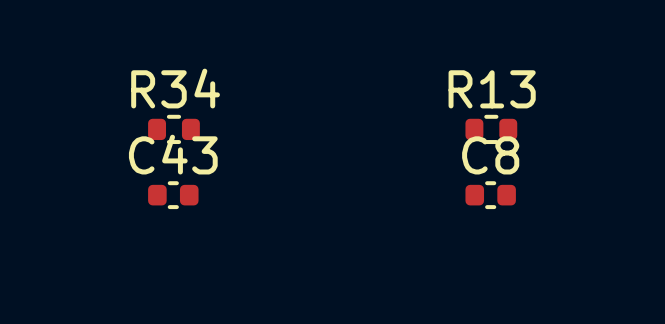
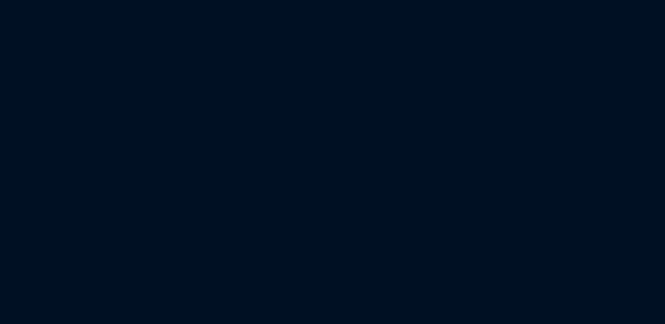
R34: (173, 129) -> none
R13: (491, 129) -> none
C43: (173, 195) -> none
C8: (490, 195) -> none

